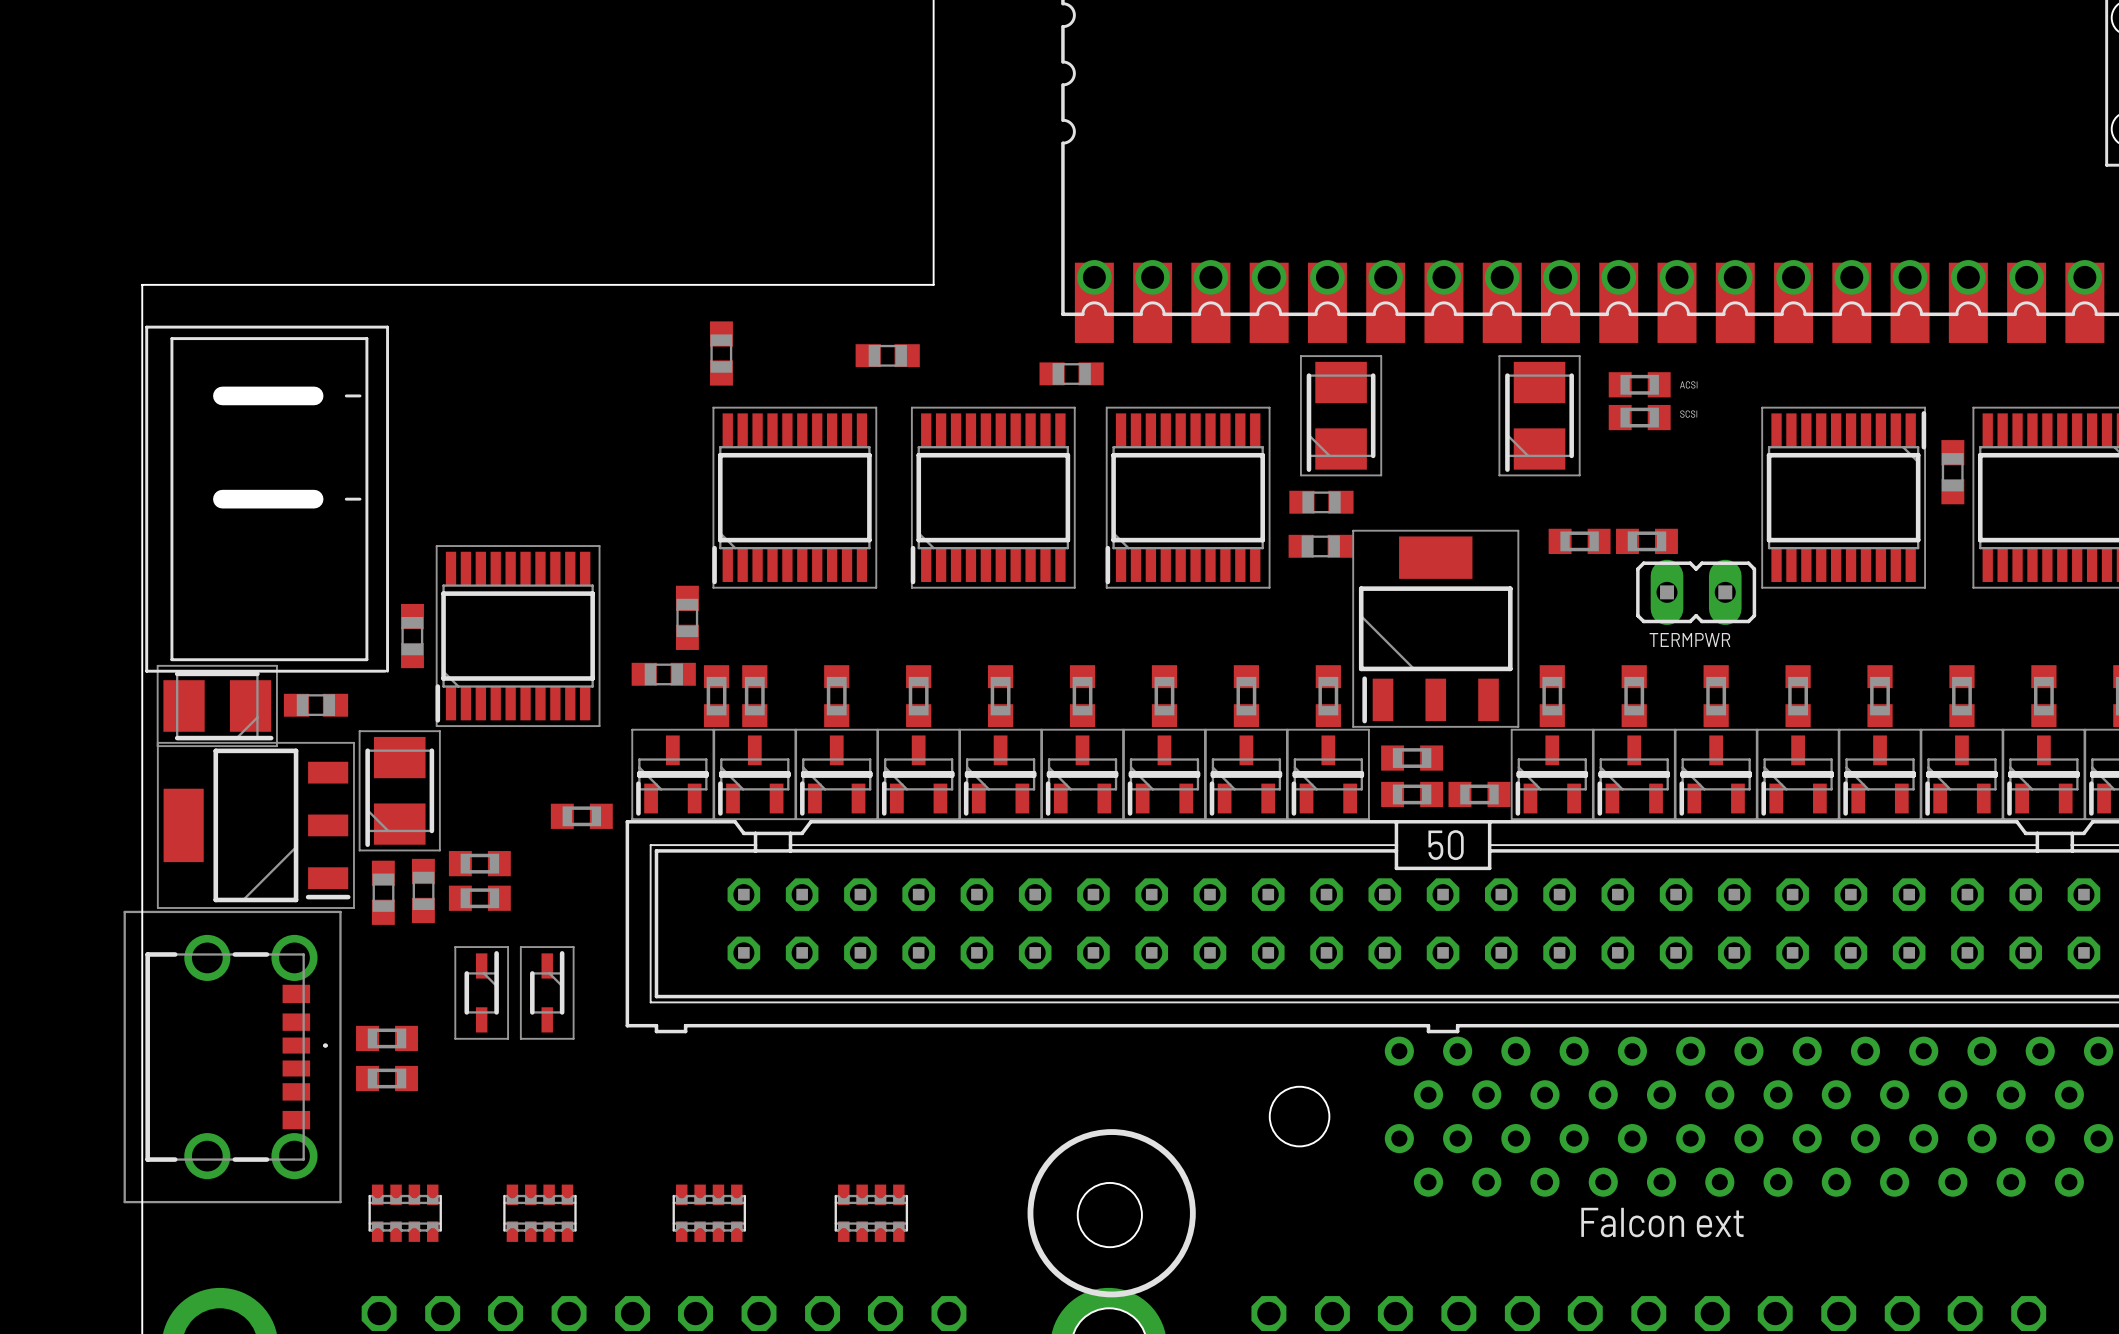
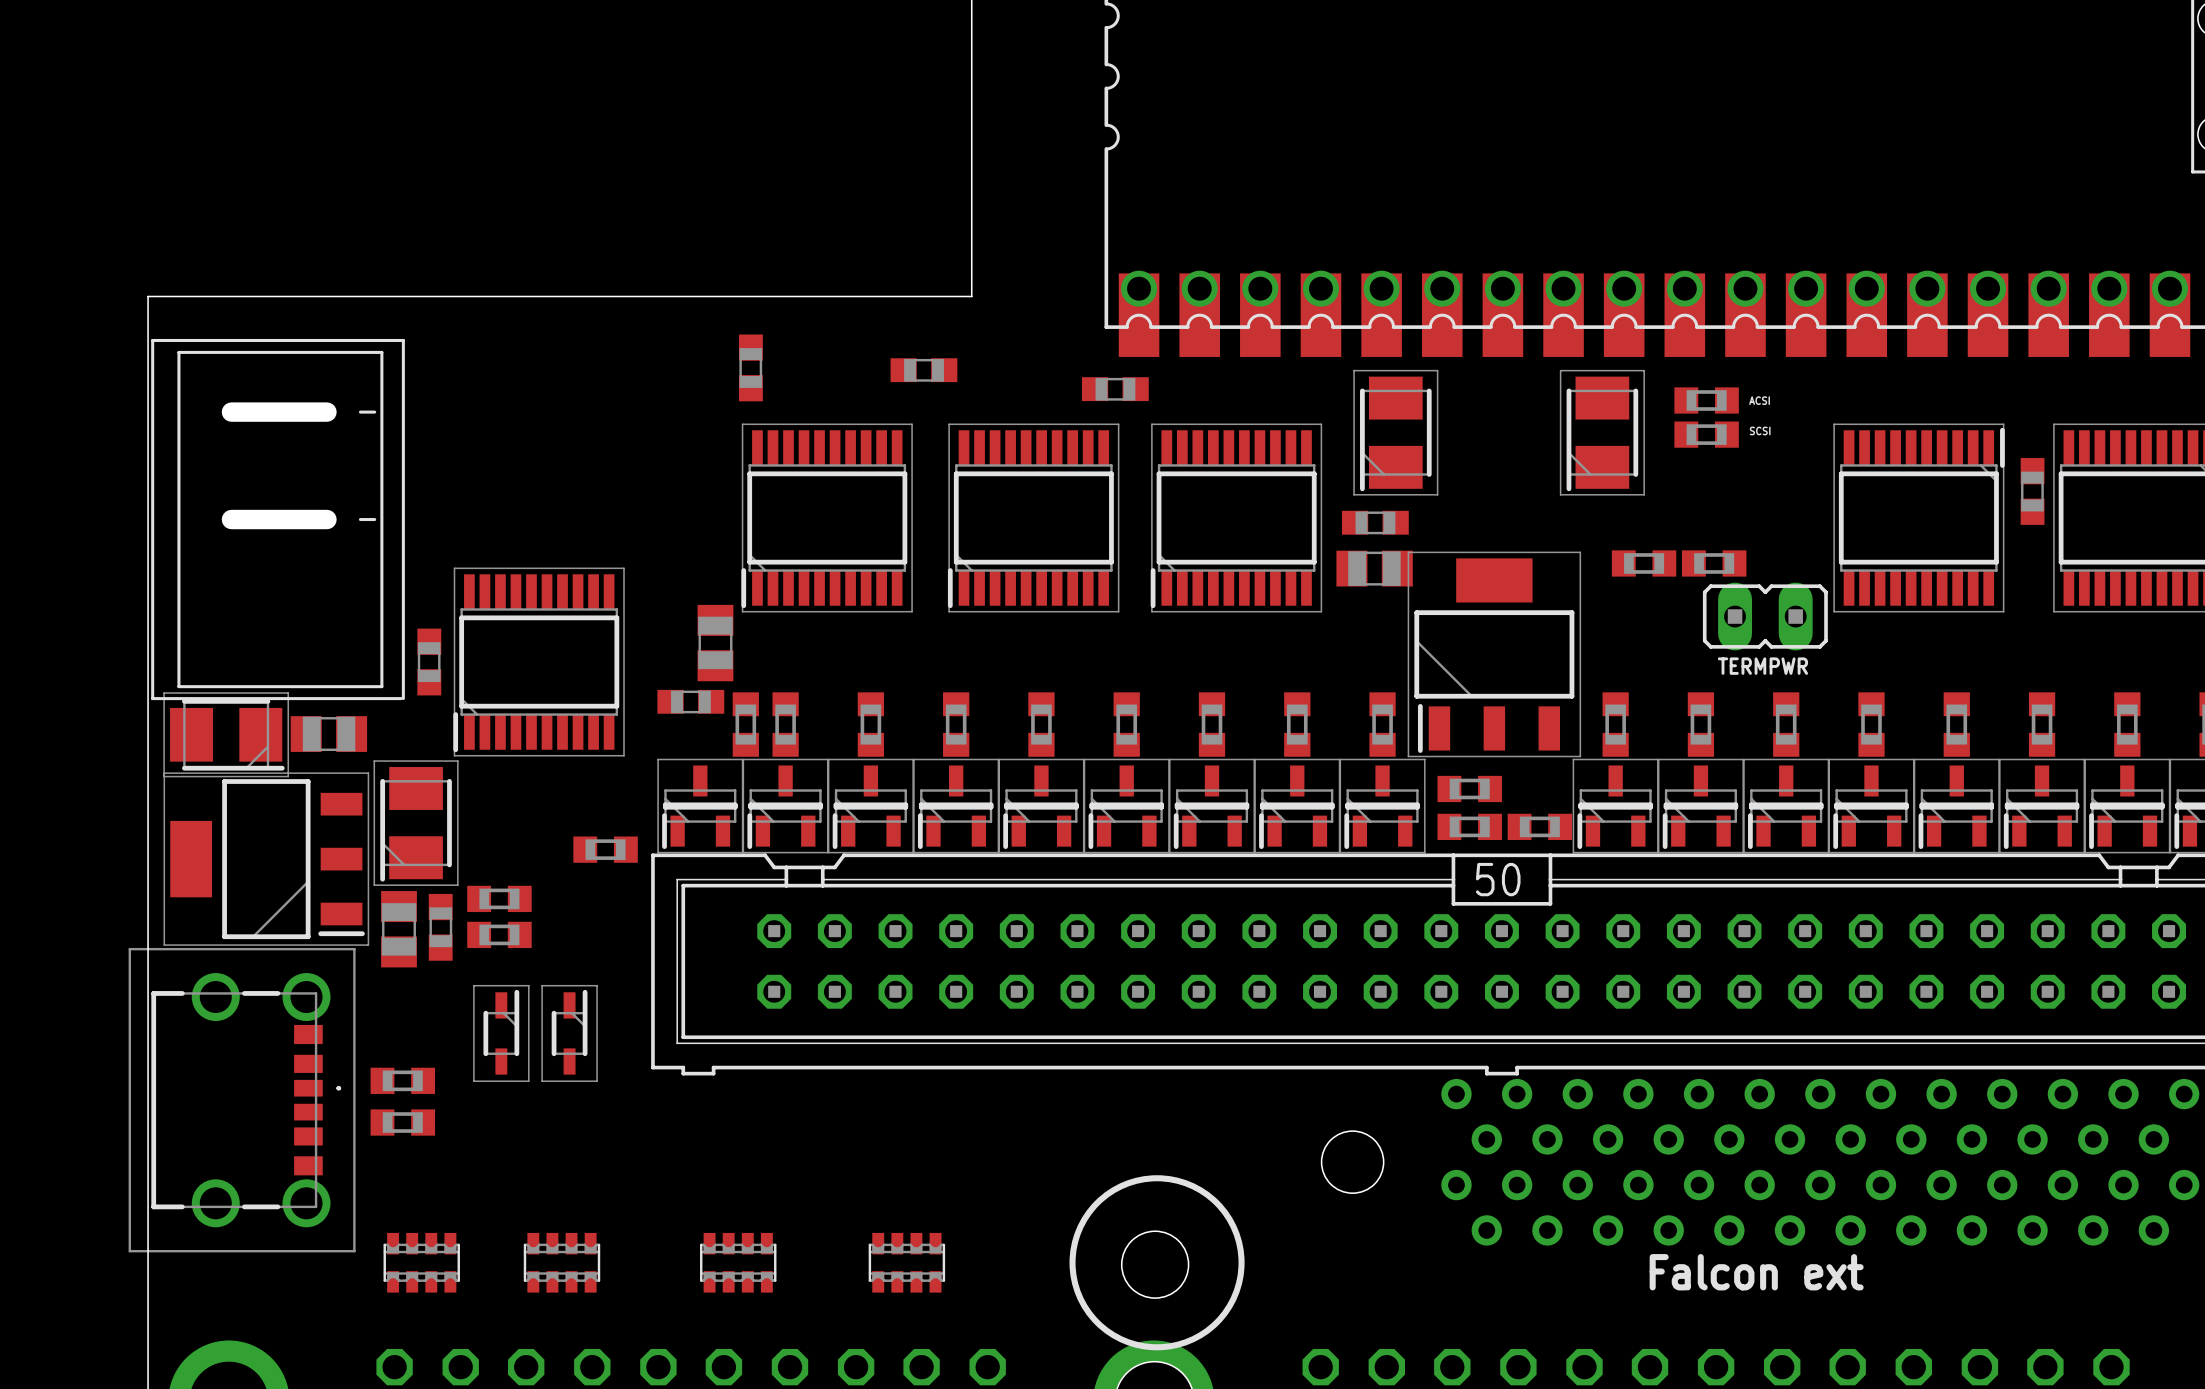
part footprint: [1288, 534, 1353, 558] -> [1336, 550, 1413, 587]
part footprint: [675, 585, 699, 650] -> [697, 604, 734, 682]
part footprint: [283, 693, 349, 717] -> [290, 716, 368, 752]
part footprint: [371, 860, 395, 925] -> [381, 891, 417, 968]

